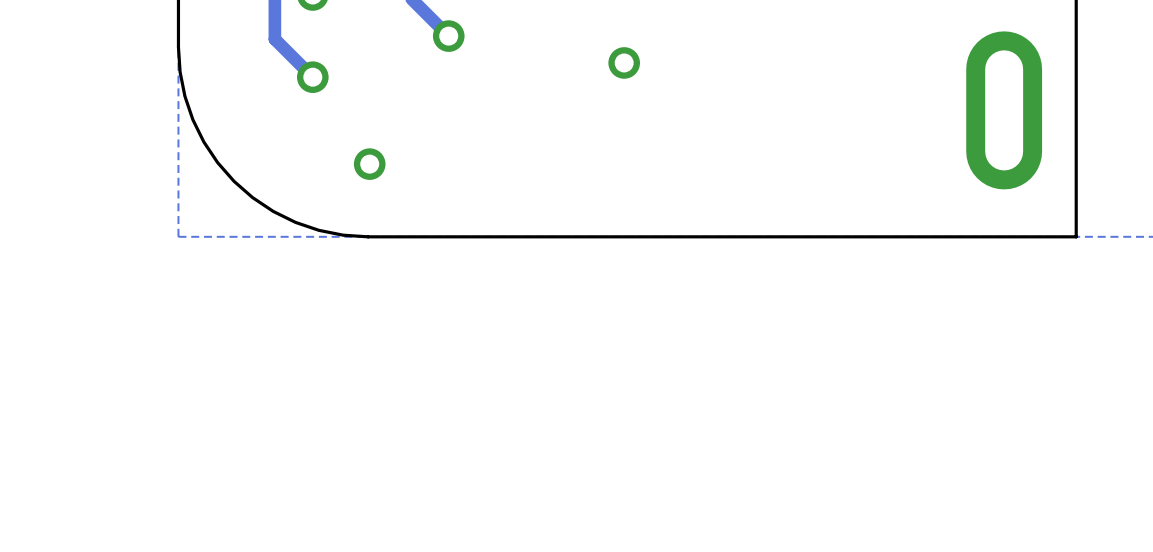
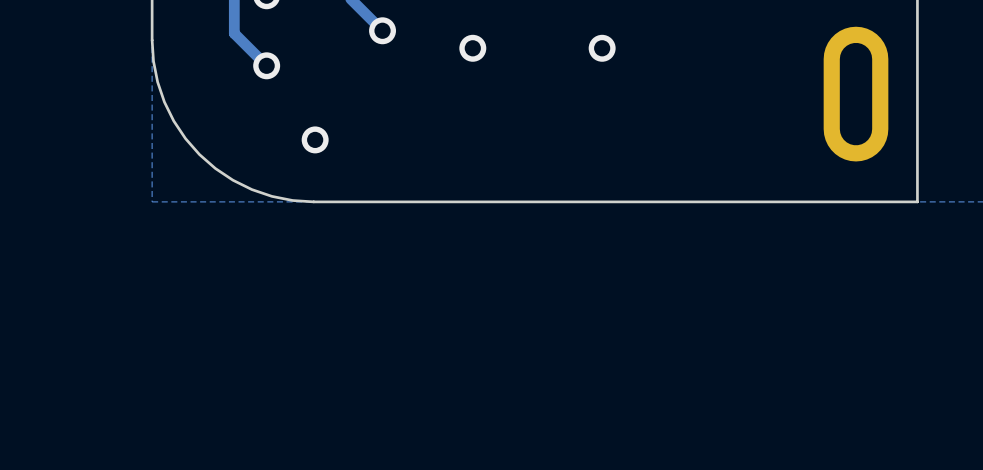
via: none -> (472, 48)
via: none -> (602, 48)
via: (624, 62) -> none

